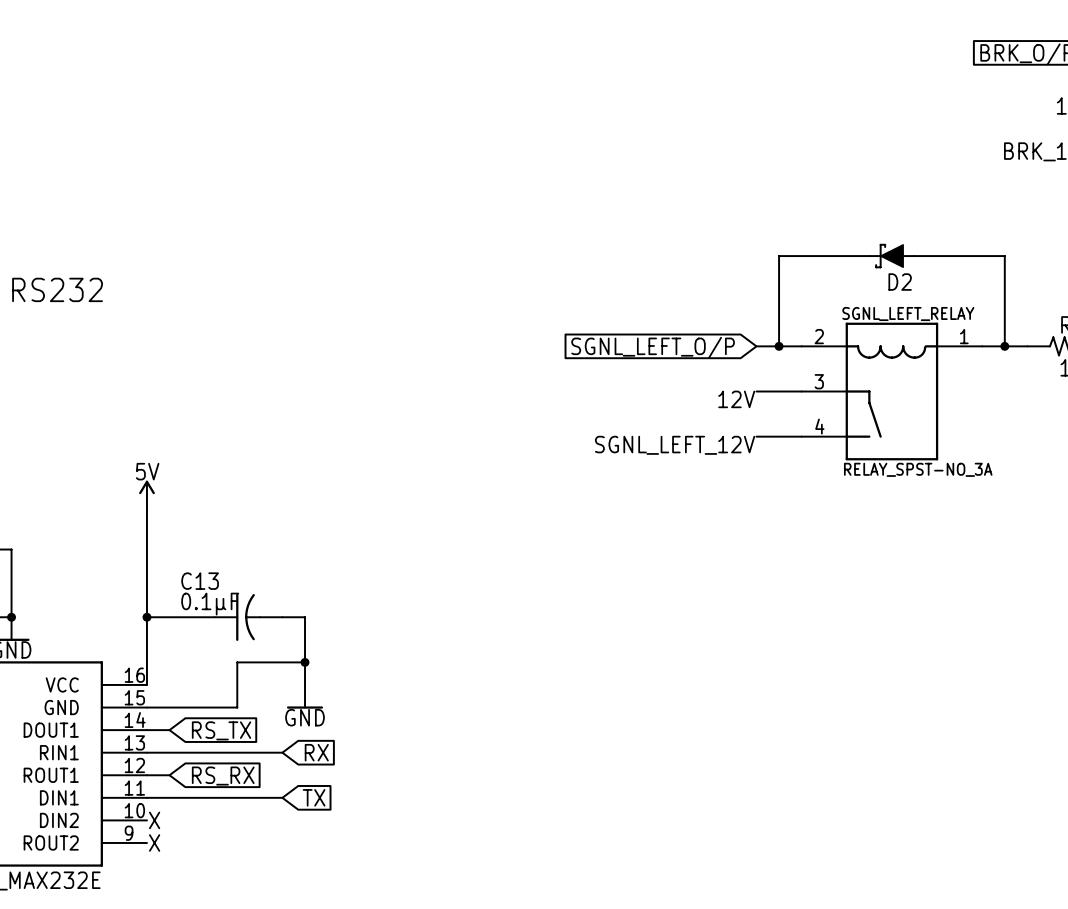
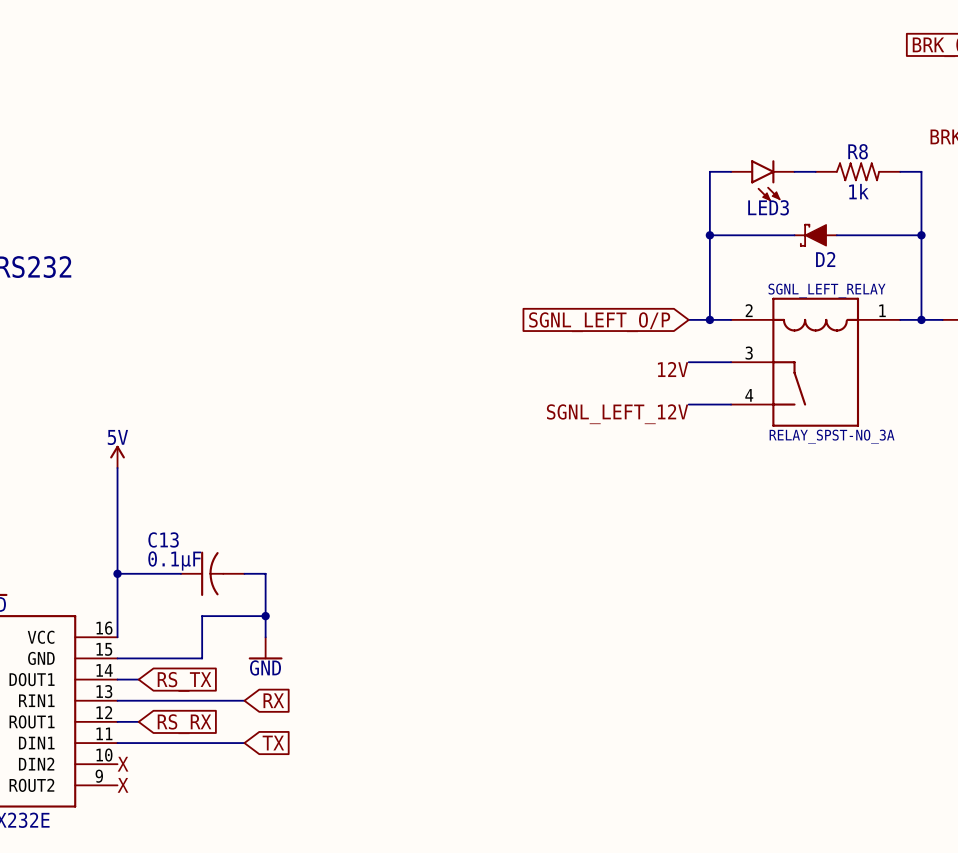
wire: none -> (731, 171) (709, 171) (709, 235)
wire: none -> (794, 171) (815, 171)
R8: none -> 1k (858, 171)
wire: none -> (900, 171) (921, 171) (921, 235)
LED3: none -> (762, 180)
junction: none -> (709, 235)
junction: none -> (921, 235)

